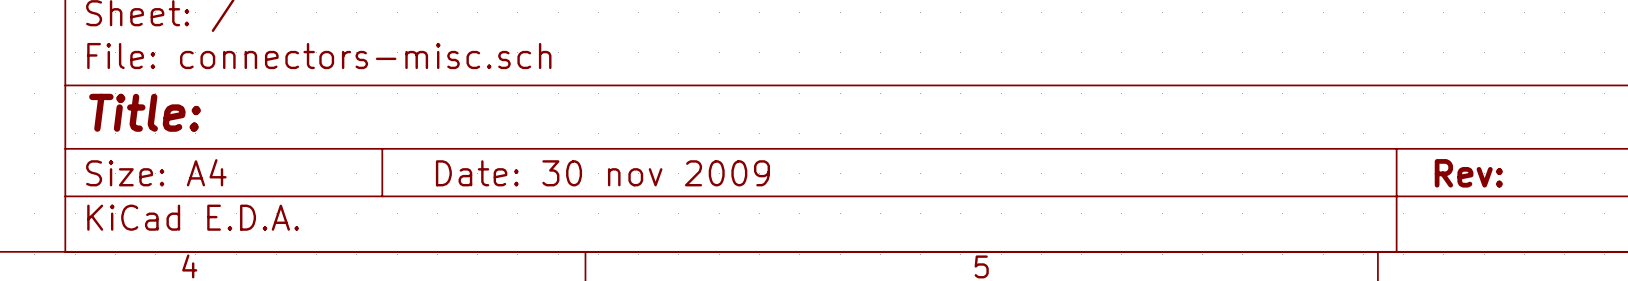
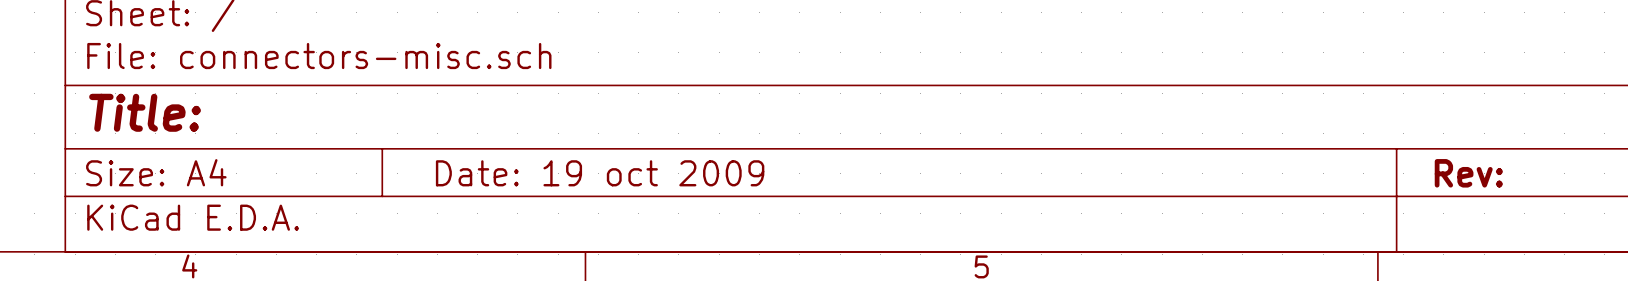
title block: Date: 30 nov 2009 (602, 173) -> Date: 19 oct 2009 (600, 173)

